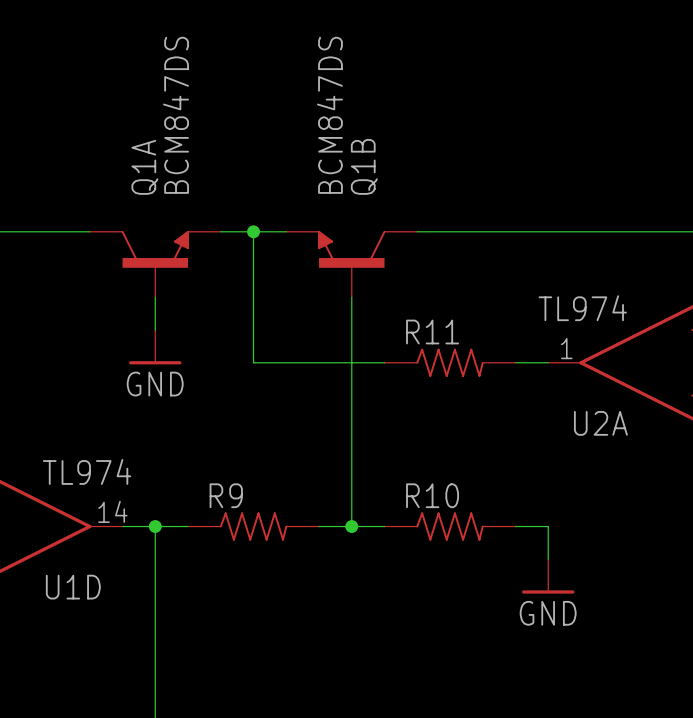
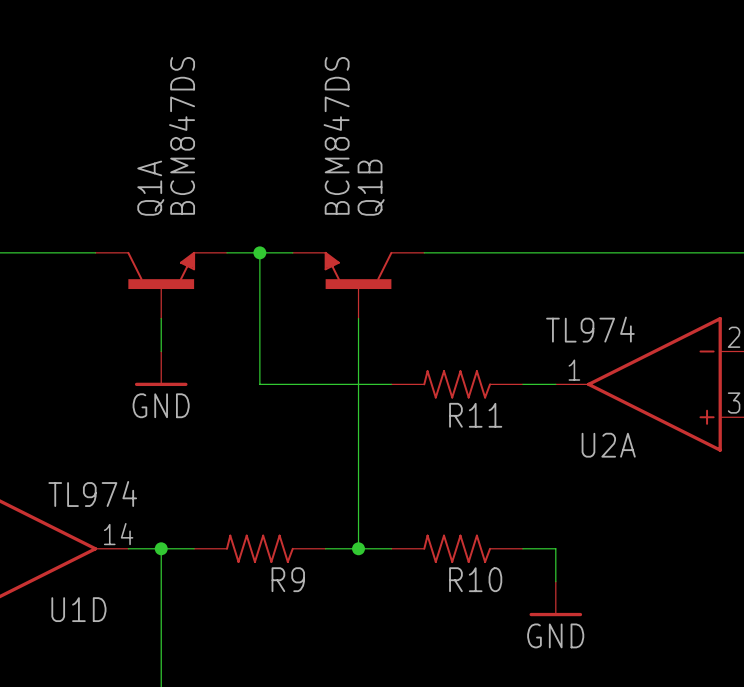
R11 rotation: 0° (450, 362) -> 180° (457, 384)
R9 rotation: 0° (253, 526) -> 180° (259, 548)
R10 rotation: 0° (450, 526) -> 180° (457, 548)

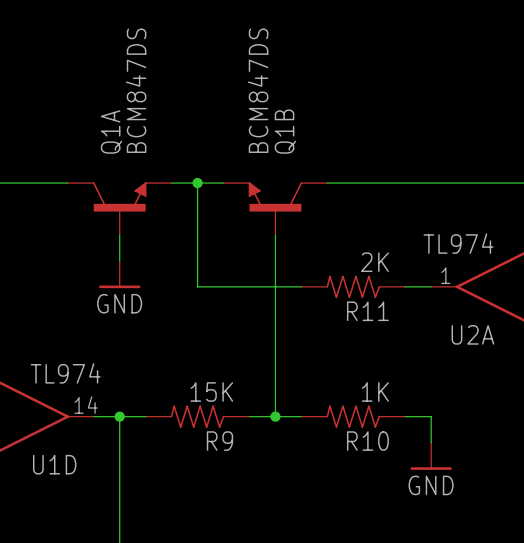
R11 value: none -> 2K (374, 262)
R9 value: none -> 15K (211, 391)
R10 value: none -> 1K (375, 391)

